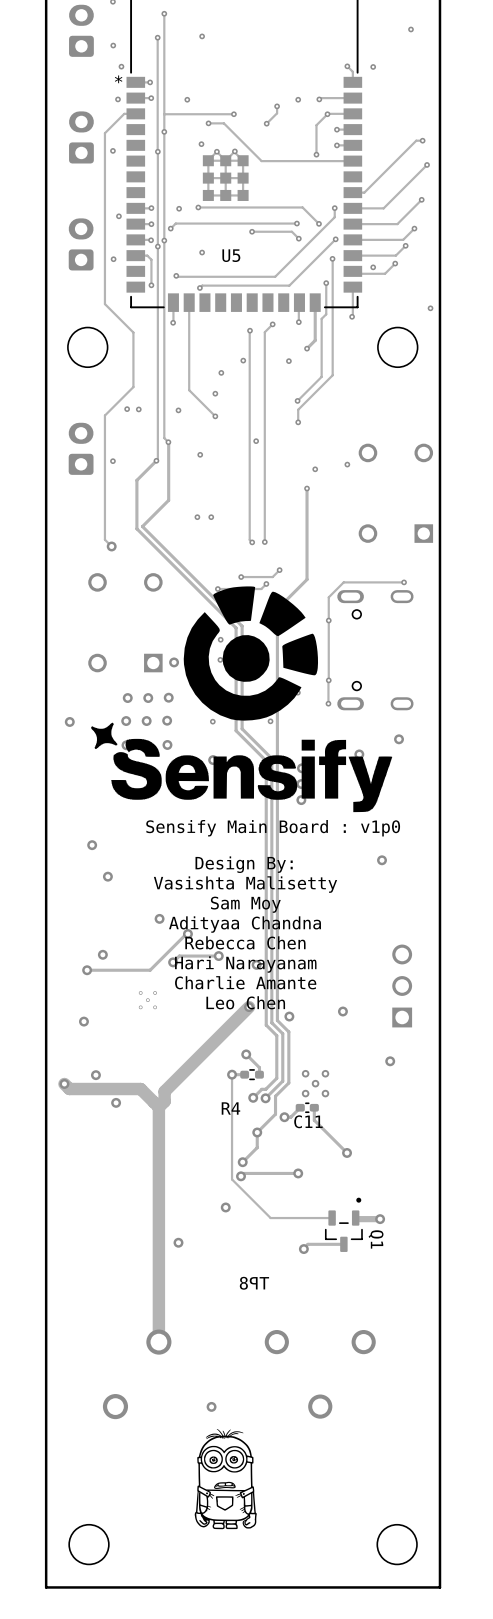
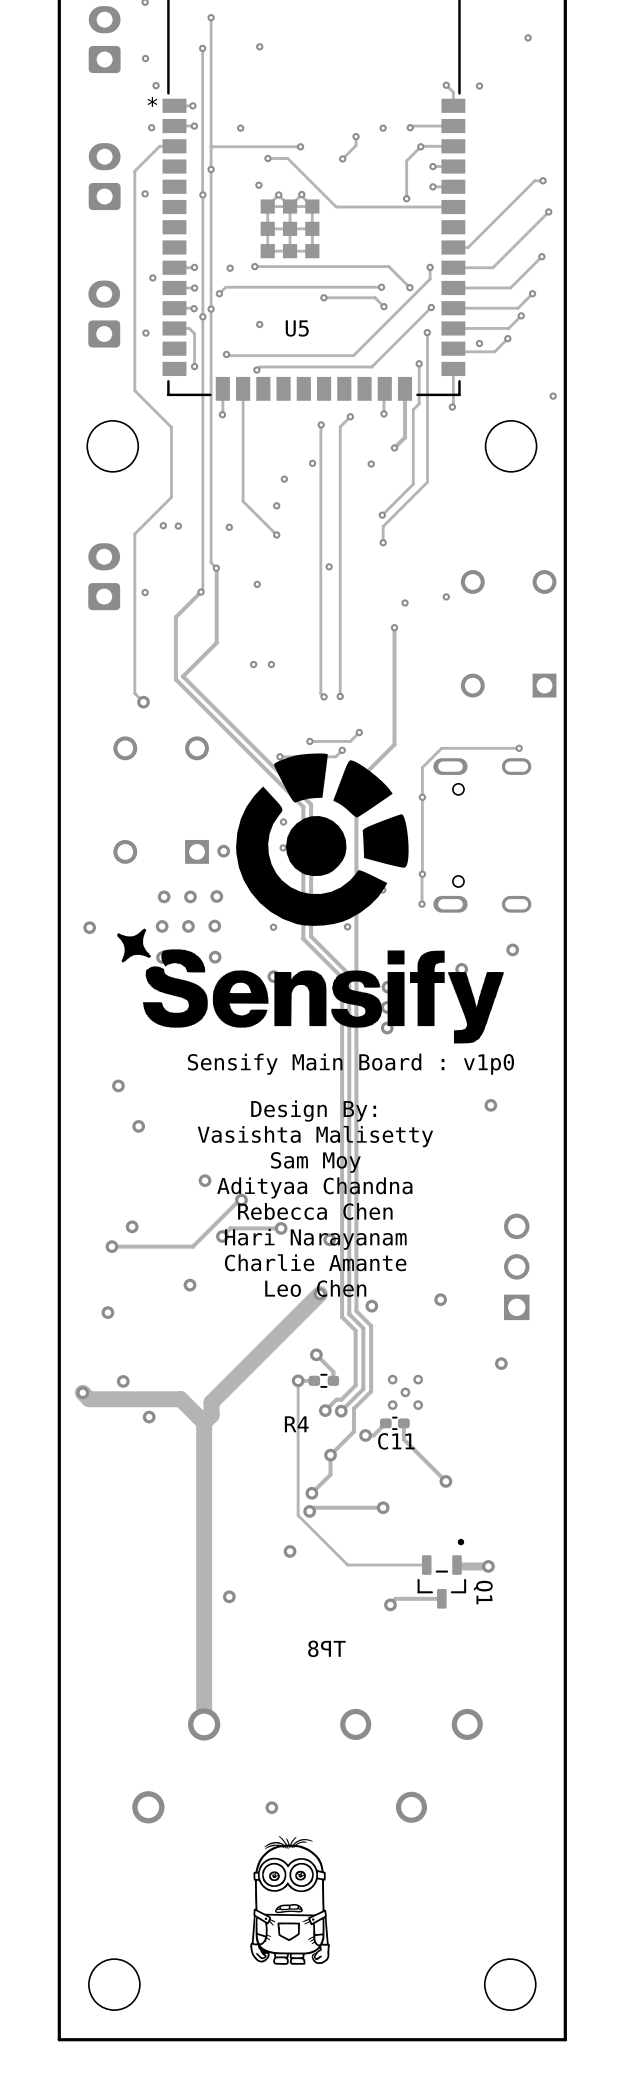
part: (147, 1000) -> none
via: none -> (190, 1285)

